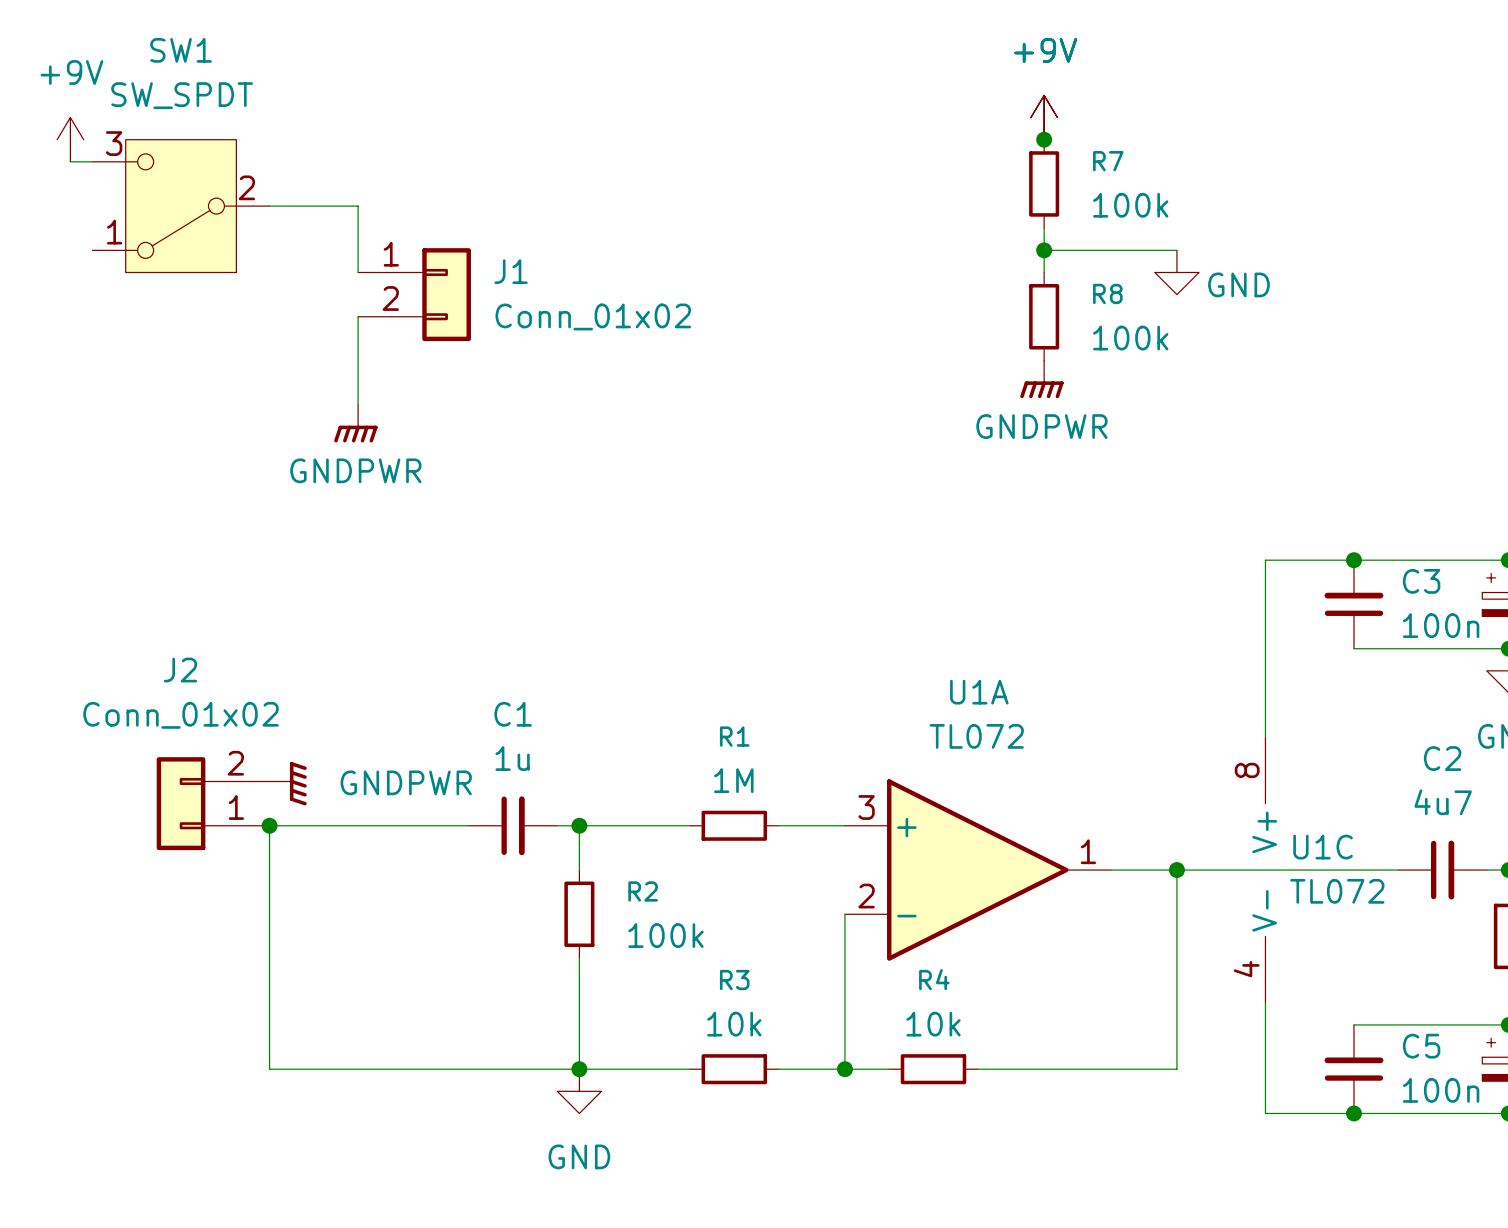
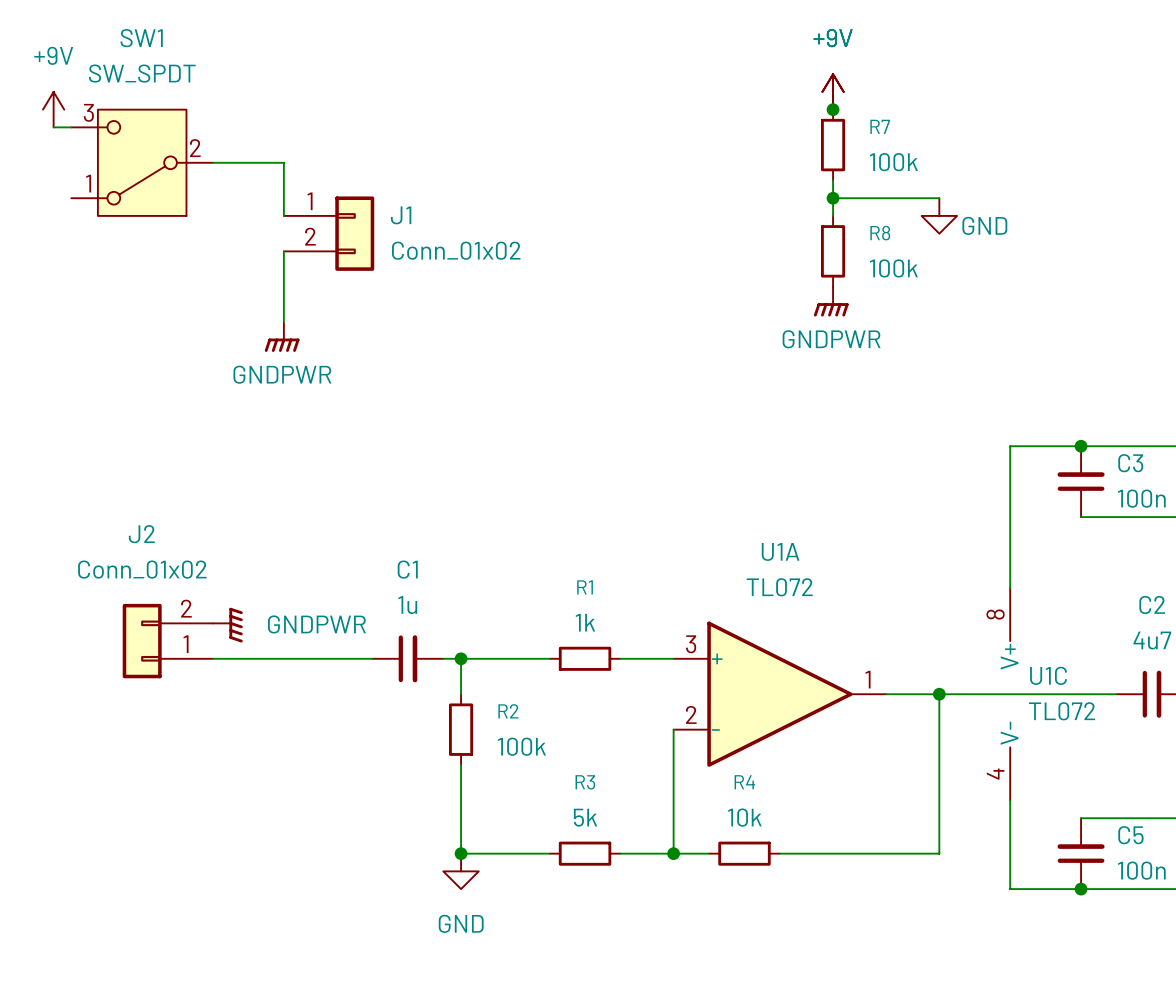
R1 value: 1M (733, 780) -> 1k (585, 622)
wire: (269, 825) (269, 1069) (579, 1069) -> none
junction: (269, 825) -> none
R3 value: 10k (734, 1024) -> 5k (585, 817)

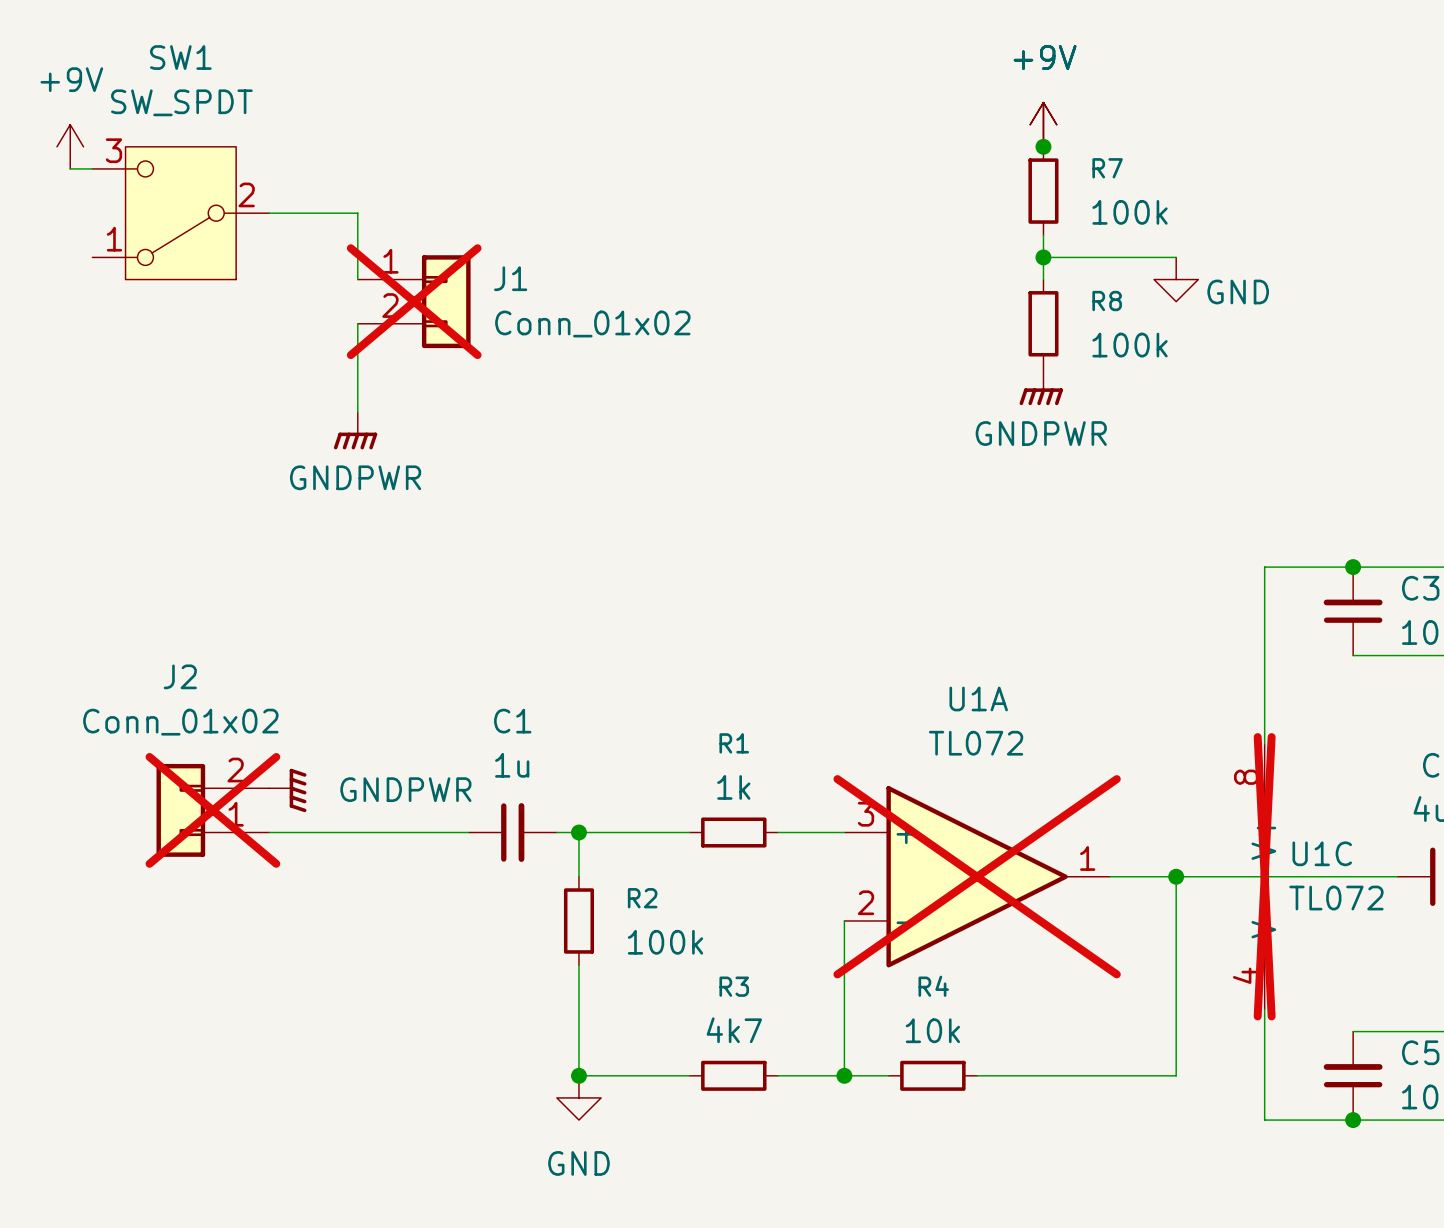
J1 do-not-place cross: none -> (414, 301)
J2 do-not-place cross: none -> (212, 810)
U1A do-not-place cross: none -> (977, 876)
U1C do-not-place cross: none -> (1264, 876)
R3 value: 5k (585, 817) -> 4k7 (734, 1030)

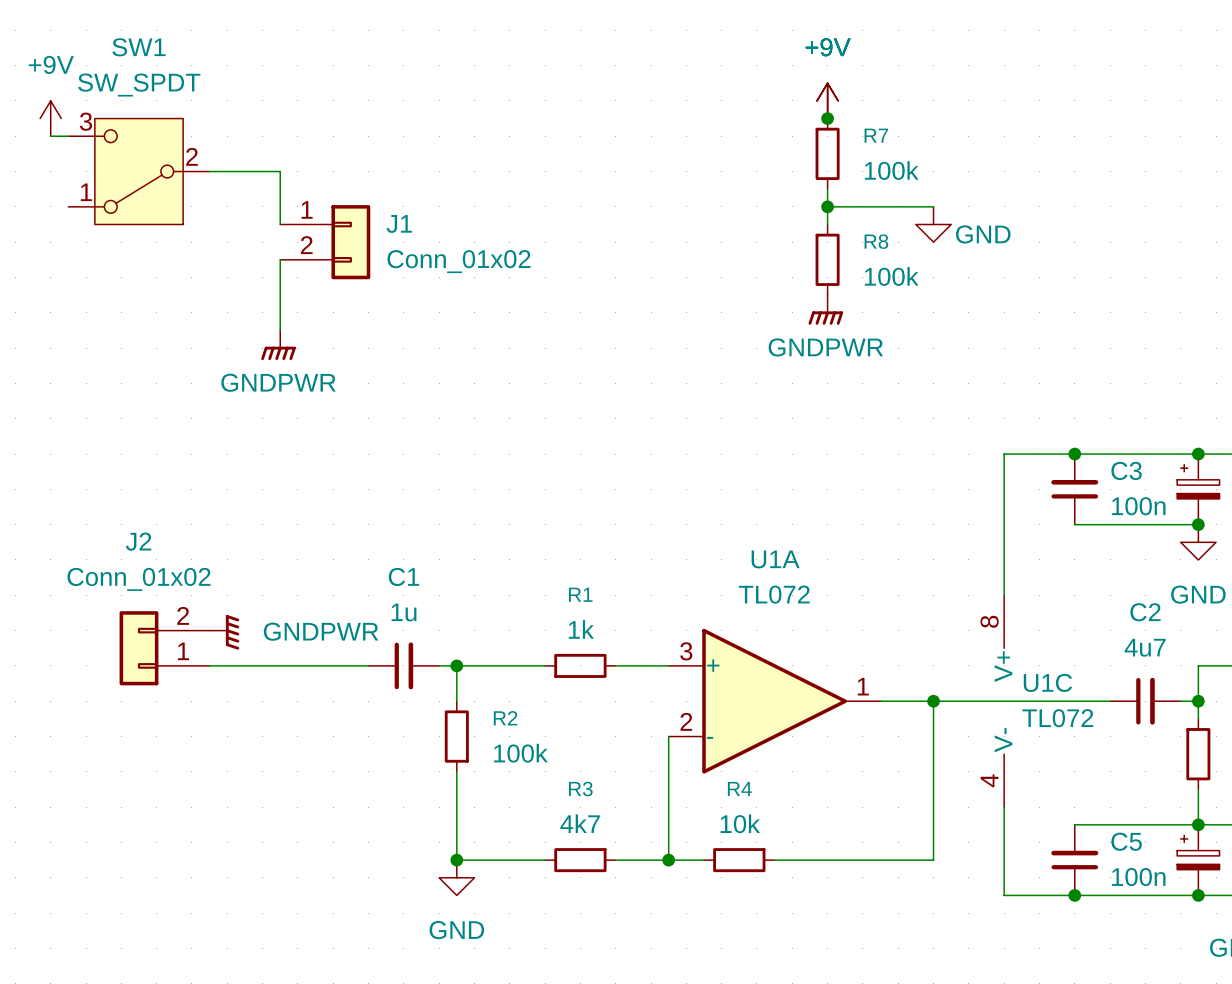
J1 do-not-place cross: (414, 301) -> none
J2 do-not-place cross: (212, 810) -> none
U1A do-not-place cross: (977, 876) -> none
U1C do-not-place cross: (1264, 876) -> none

